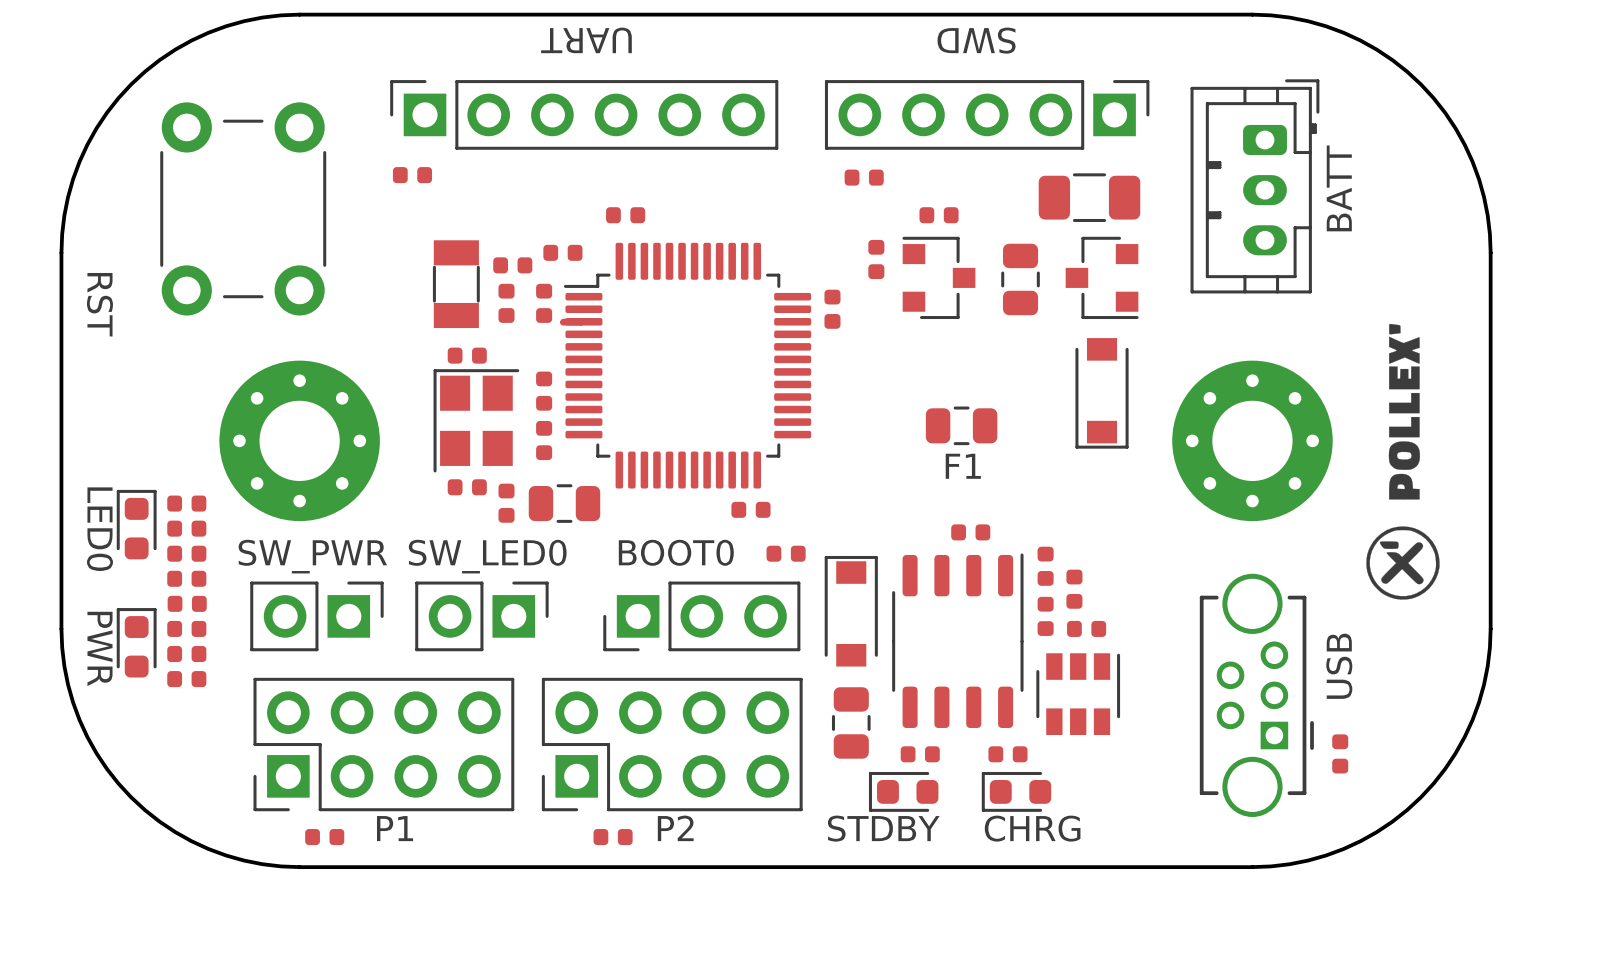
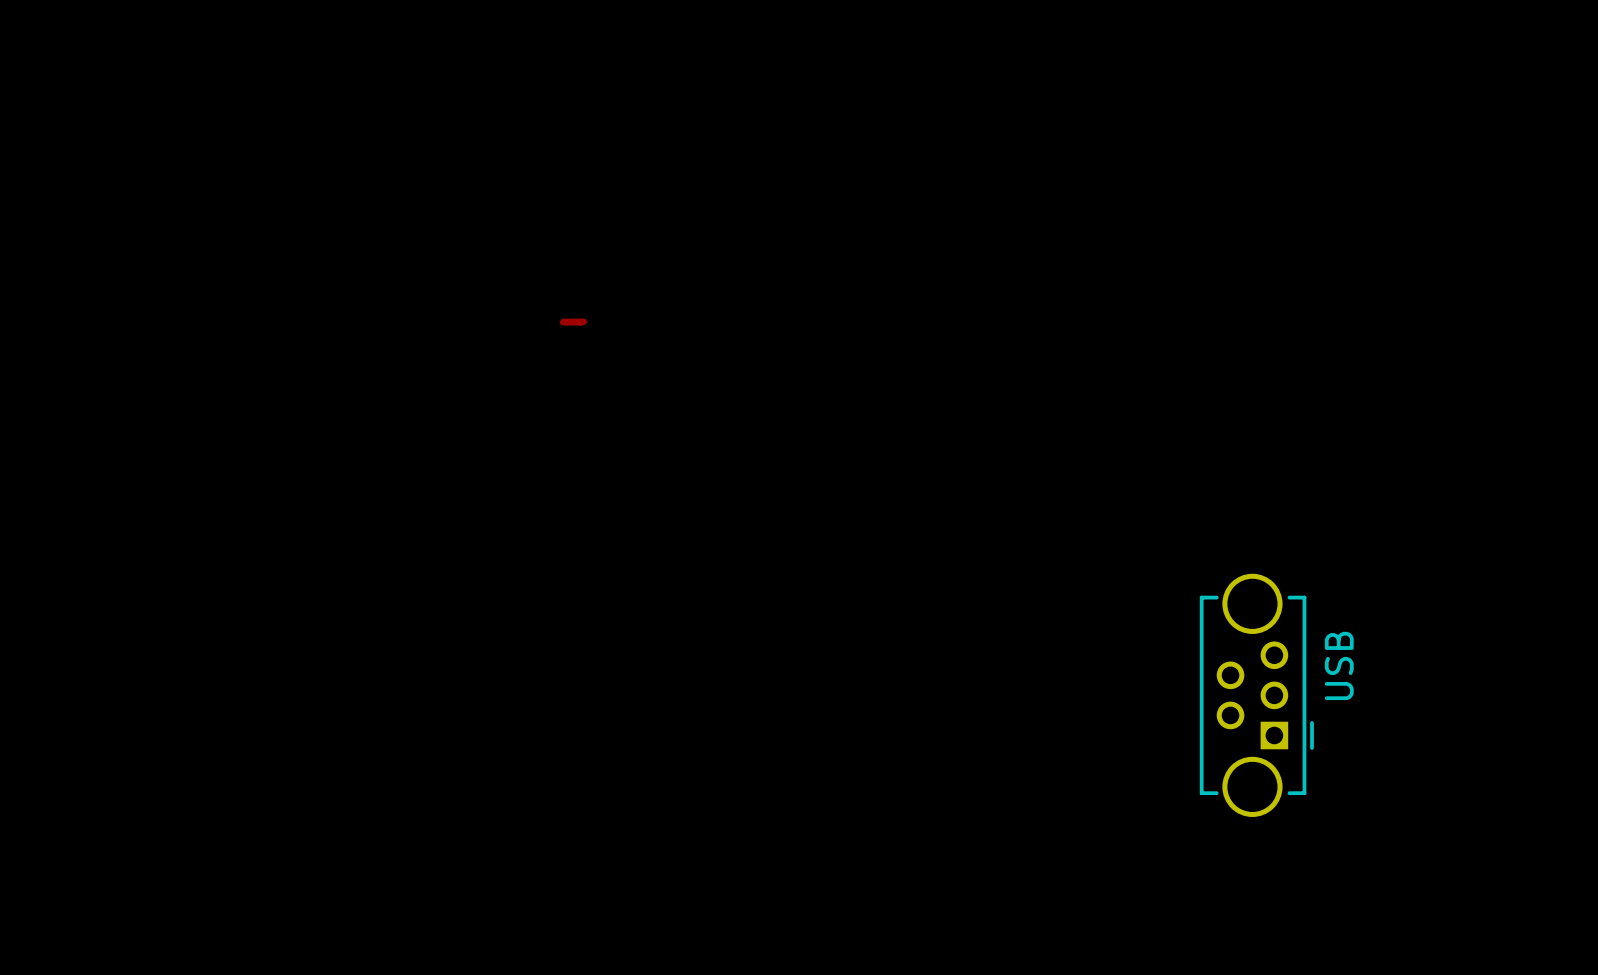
board edge: (299, 14) (1252, 14) (1289, 17) (1326, 26) (1376, 49) (1420, 84) (1455, 128) (1479, 179) (1489, 234) (1489, 647) (1479, 702) (1455, 753) (1420, 797) (1376, 832) (1326, 855) (1271, 866) (299, 867) (262, 864) (226, 855) (175, 832) (131, 797) (96, 753) (73, 702) (64, 666) (61, 628) (61, 252) (64, 215) (73, 179) (96, 128) (118, 98) (144, 71) (175, 49) (226, 26) (262, 17) (299, 14) -> none
UART: (584, 114) -> none
SWD: (987, 114) -> none
part: (412, 175) -> none
part: (864, 177) -> none
BATT: (1254, 186) -> none
part: (1089, 197) -> none
RST: (243, 208) -> none
part: (625, 215) -> none
part: (939, 215) -> none
part: (562, 252) -> none
part: (876, 259) -> none
part: (512, 265) -> none
part: (938, 277) -> none
part: (1102, 277) -> none
part: (1020, 279) -> none
part: (456, 284) -> none
part: (506, 303) -> none
part: (544, 303) -> none
part: (832, 309) -> none
drawing: [1366, 323, 1440, 600] -> none
part: (467, 355) -> none
part: (687, 365) -> none
part: (544, 391) -> none
part: (1102, 393) -> none
part: (476, 420) -> none
F1: (961, 425) -> none
part: (299, 440) -> none
part: (544, 440) -> none
part: (1252, 440) -> none
part: (467, 487) -> none
part: (186, 503) -> none
part: (506, 503) -> none
part: (564, 503) -> none
part: (750, 509) -> none
LED0: (136, 524) -> none
part: (186, 528) -> none
part: (970, 532) -> none
part: (186, 553) -> none
part: (786, 553) -> none
part: (1045, 566) -> none
part: (186, 578) -> none
part: (1074, 589) -> none
part: (187, 603) -> none
part: (851, 611) -> none
SW_PWR: (316, 616) -> none
SW_LED0: (481, 616) -> none
BOOT0: (701, 616) -> none
part: (1045, 616) -> none
part: (186, 628) -> none
part: (1086, 628) -> none
part: (957, 640) -> none
PWR: (136, 642) -> none
part: (186, 654) -> none
part: (186, 679) -> none
part: (1078, 694) -> none
part: (851, 722) -> none
P1: (383, 744) -> none
P2: (672, 744) -> none
part: (1340, 753) -> none
part: (920, 754) -> none
part: (1007, 754) -> none
STDBY: (903, 791) -> none
CHRG: (1016, 791) -> none
part: (324, 837) -> none
part: (613, 837) -> none

